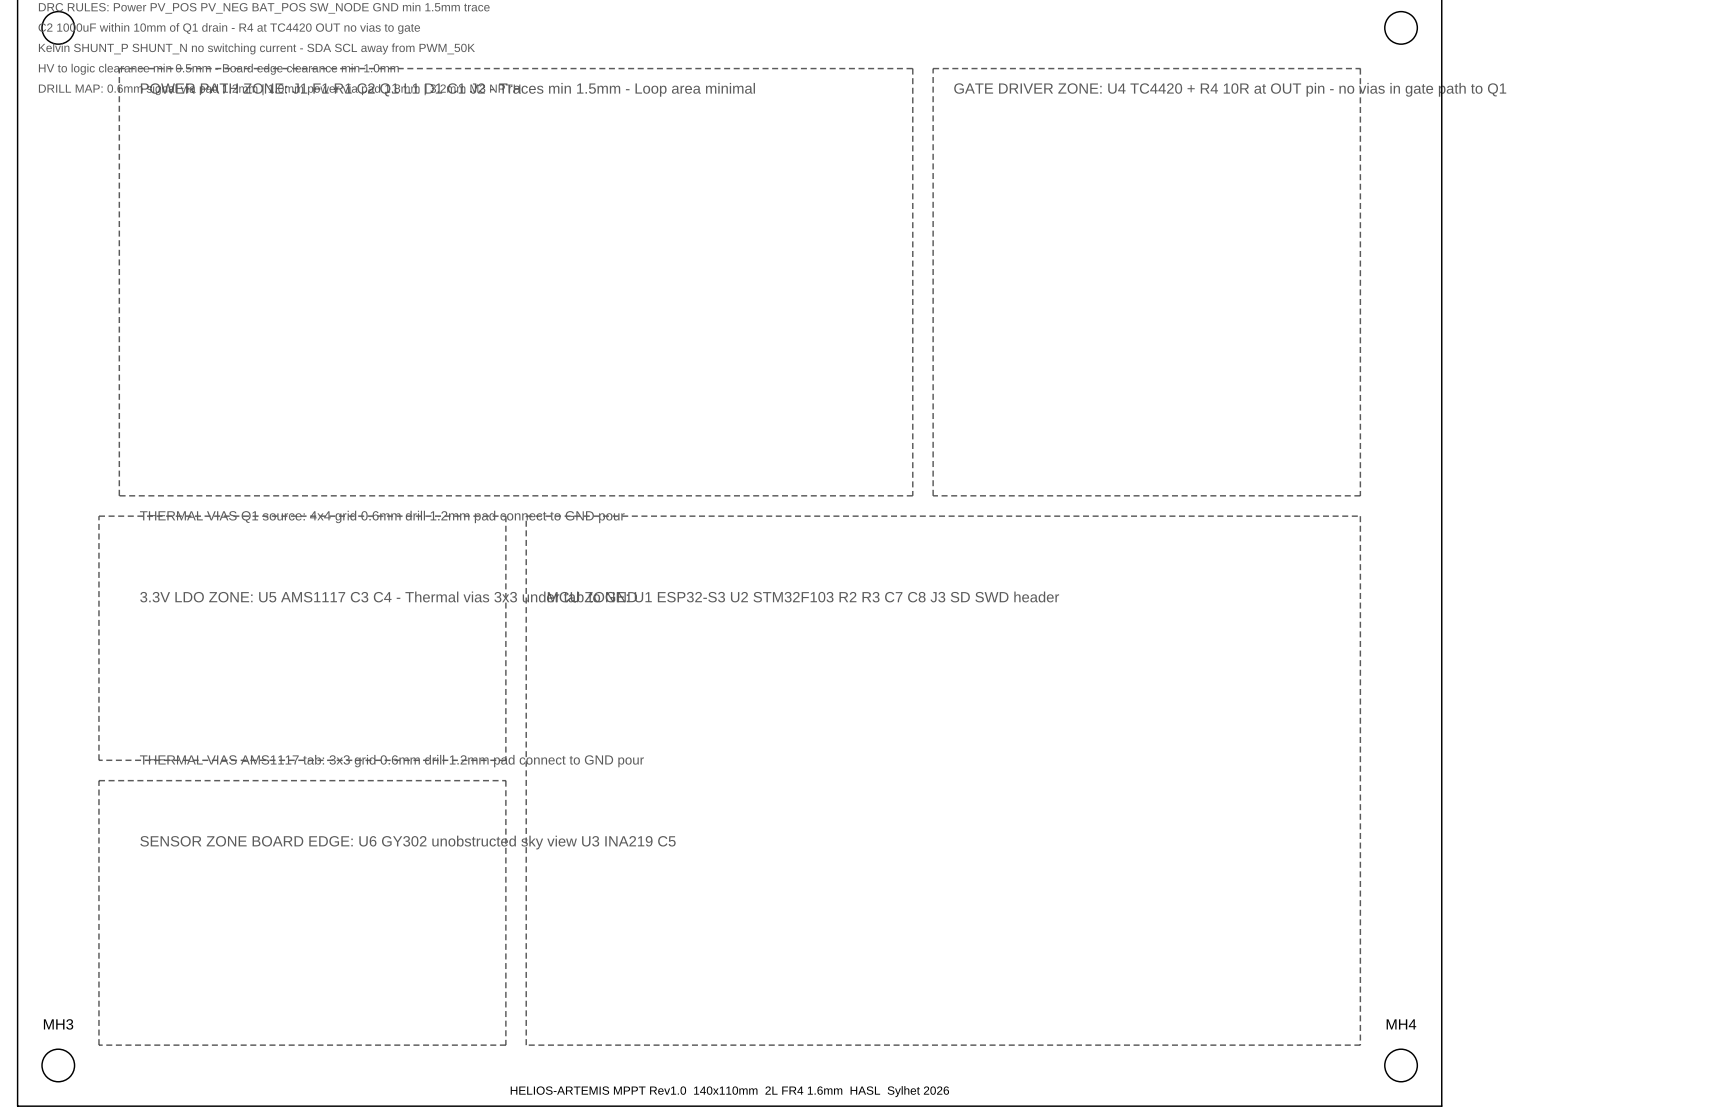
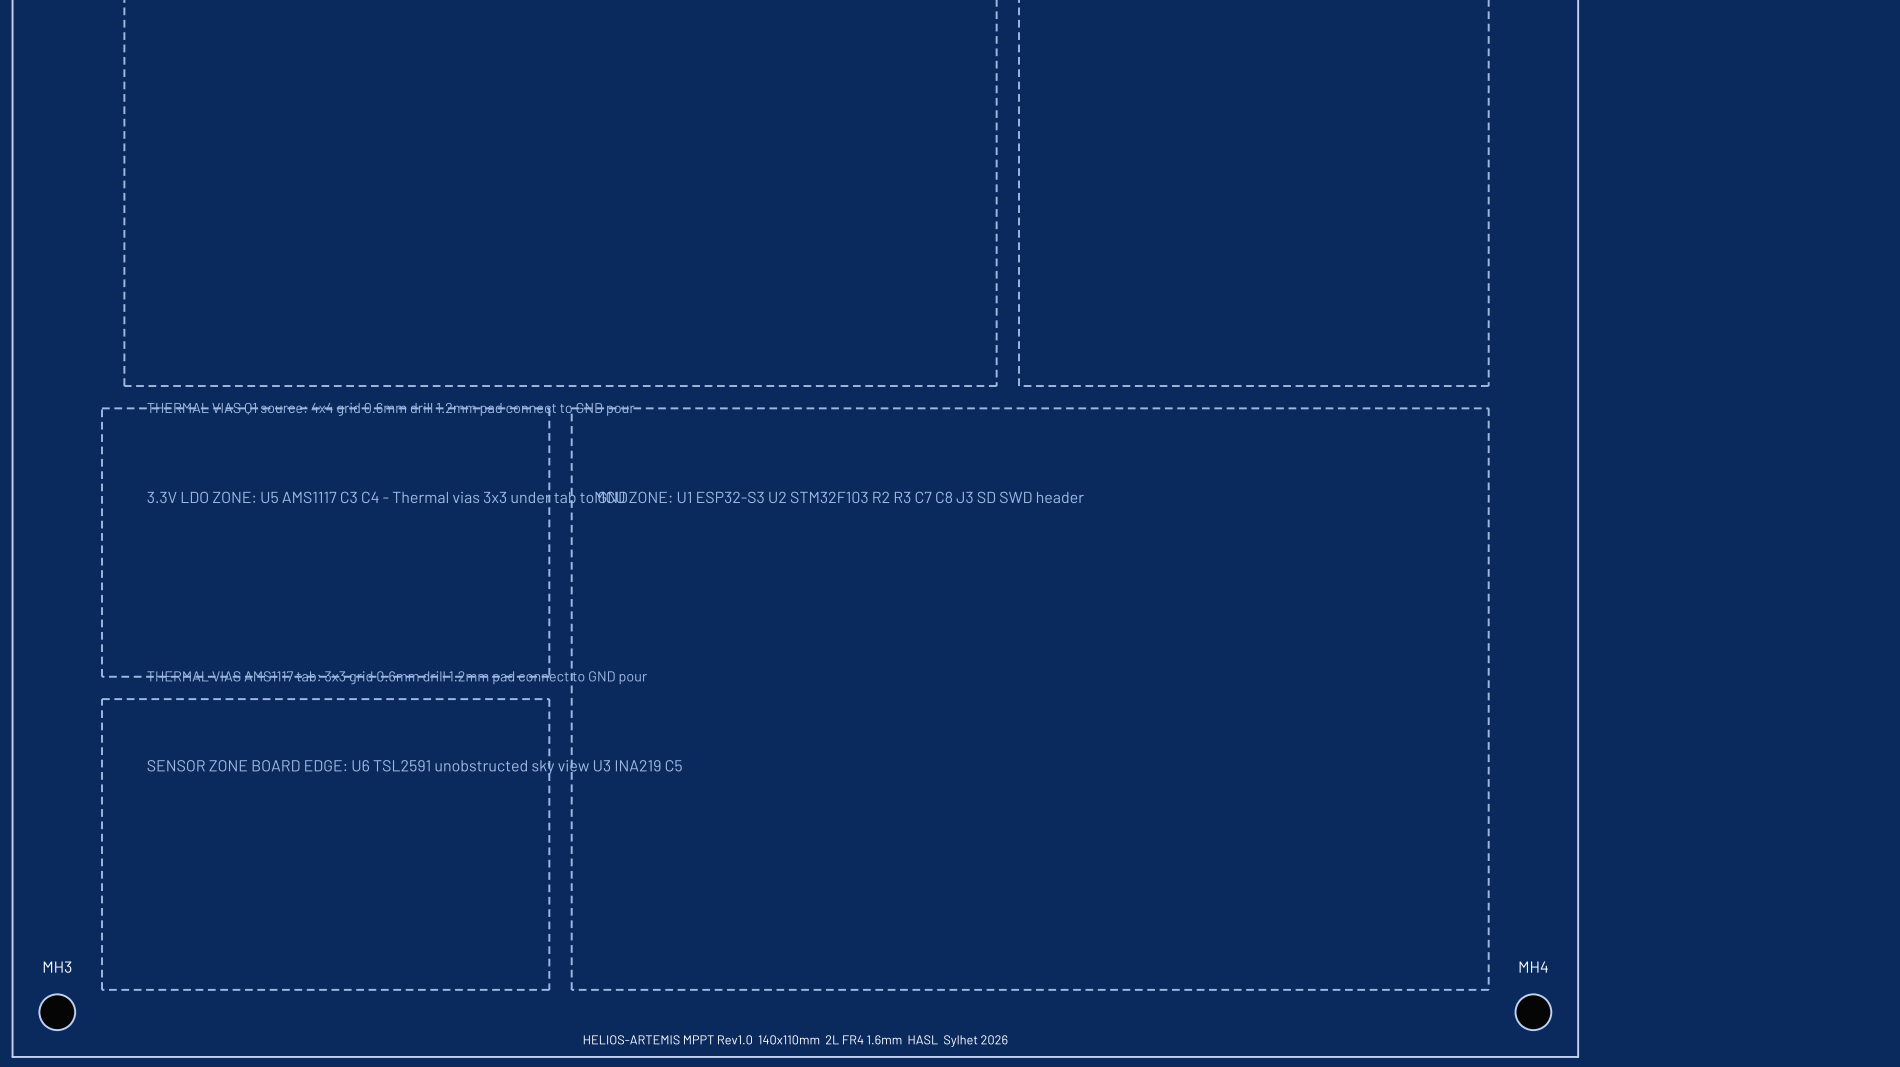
text: SENSOR ZONE BOARD EDGE: U6 GY302 unobstructed sky view U3 INA219 C5 (408, 842) -> SENSOR ZONE BOARD EDGE: U6 TSL2591 unobstructed sky view U3 INA219 C5 (414, 767)

